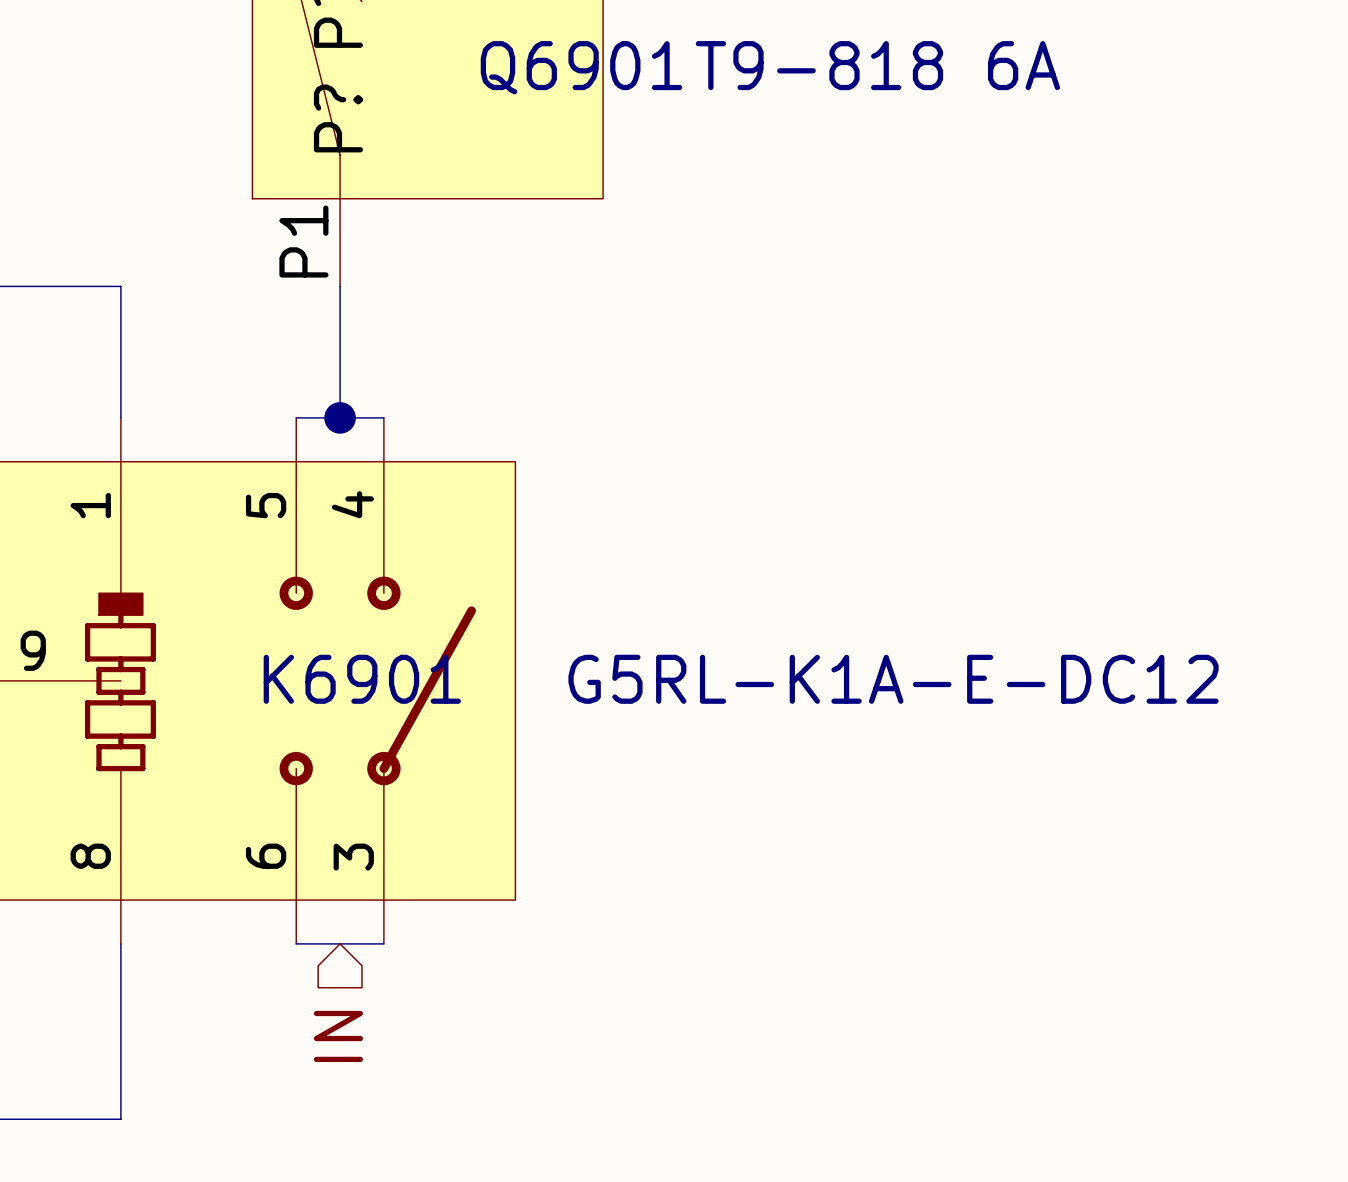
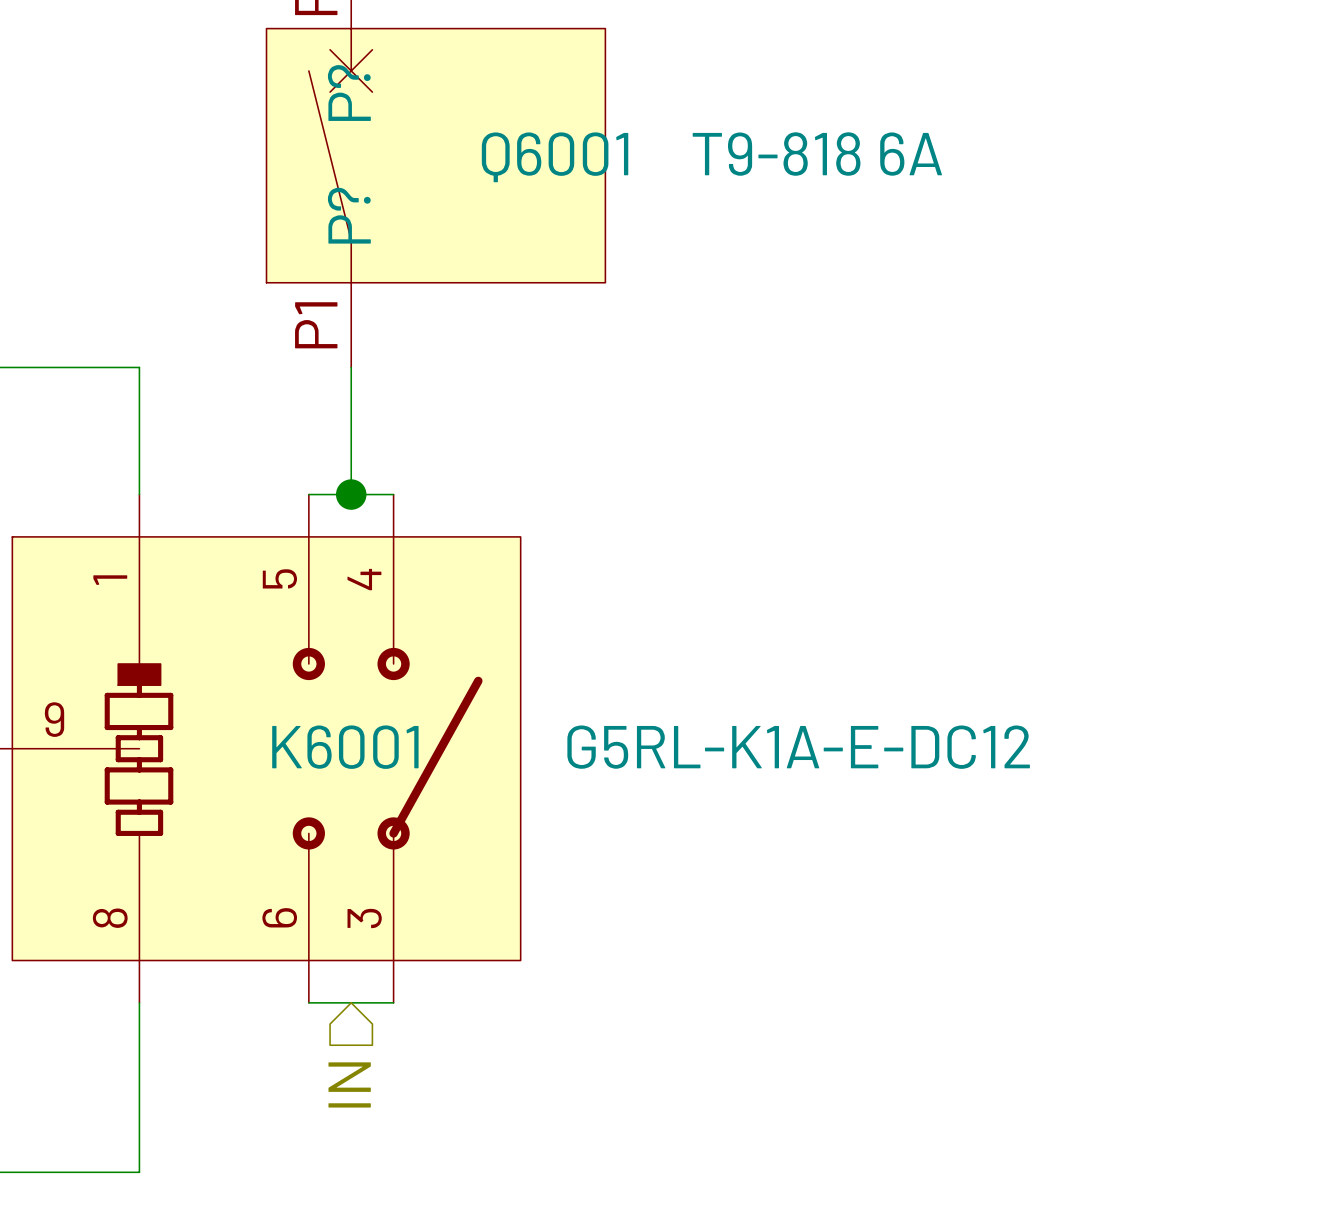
Q6901 name: Q6901 (581, 67) -> Q6001 (555, 157)
K6901 name: K6901 (362, 679) -> K6001 (345, 747)

